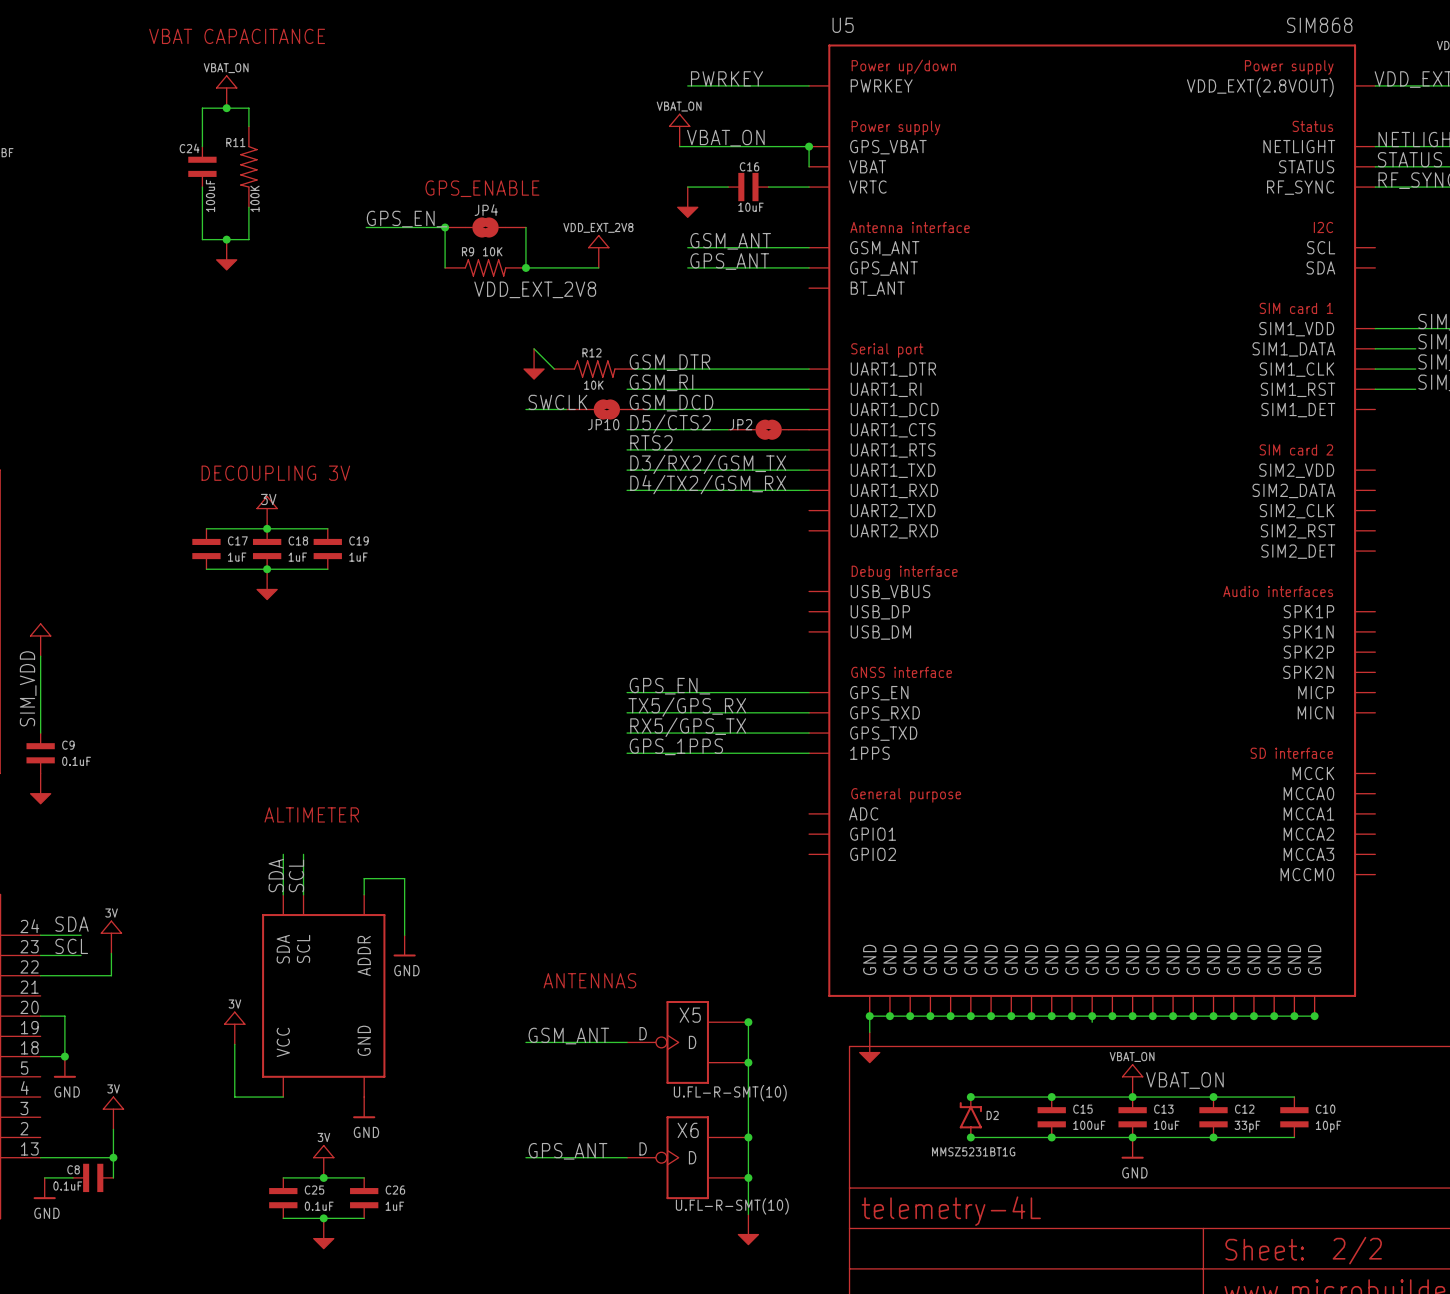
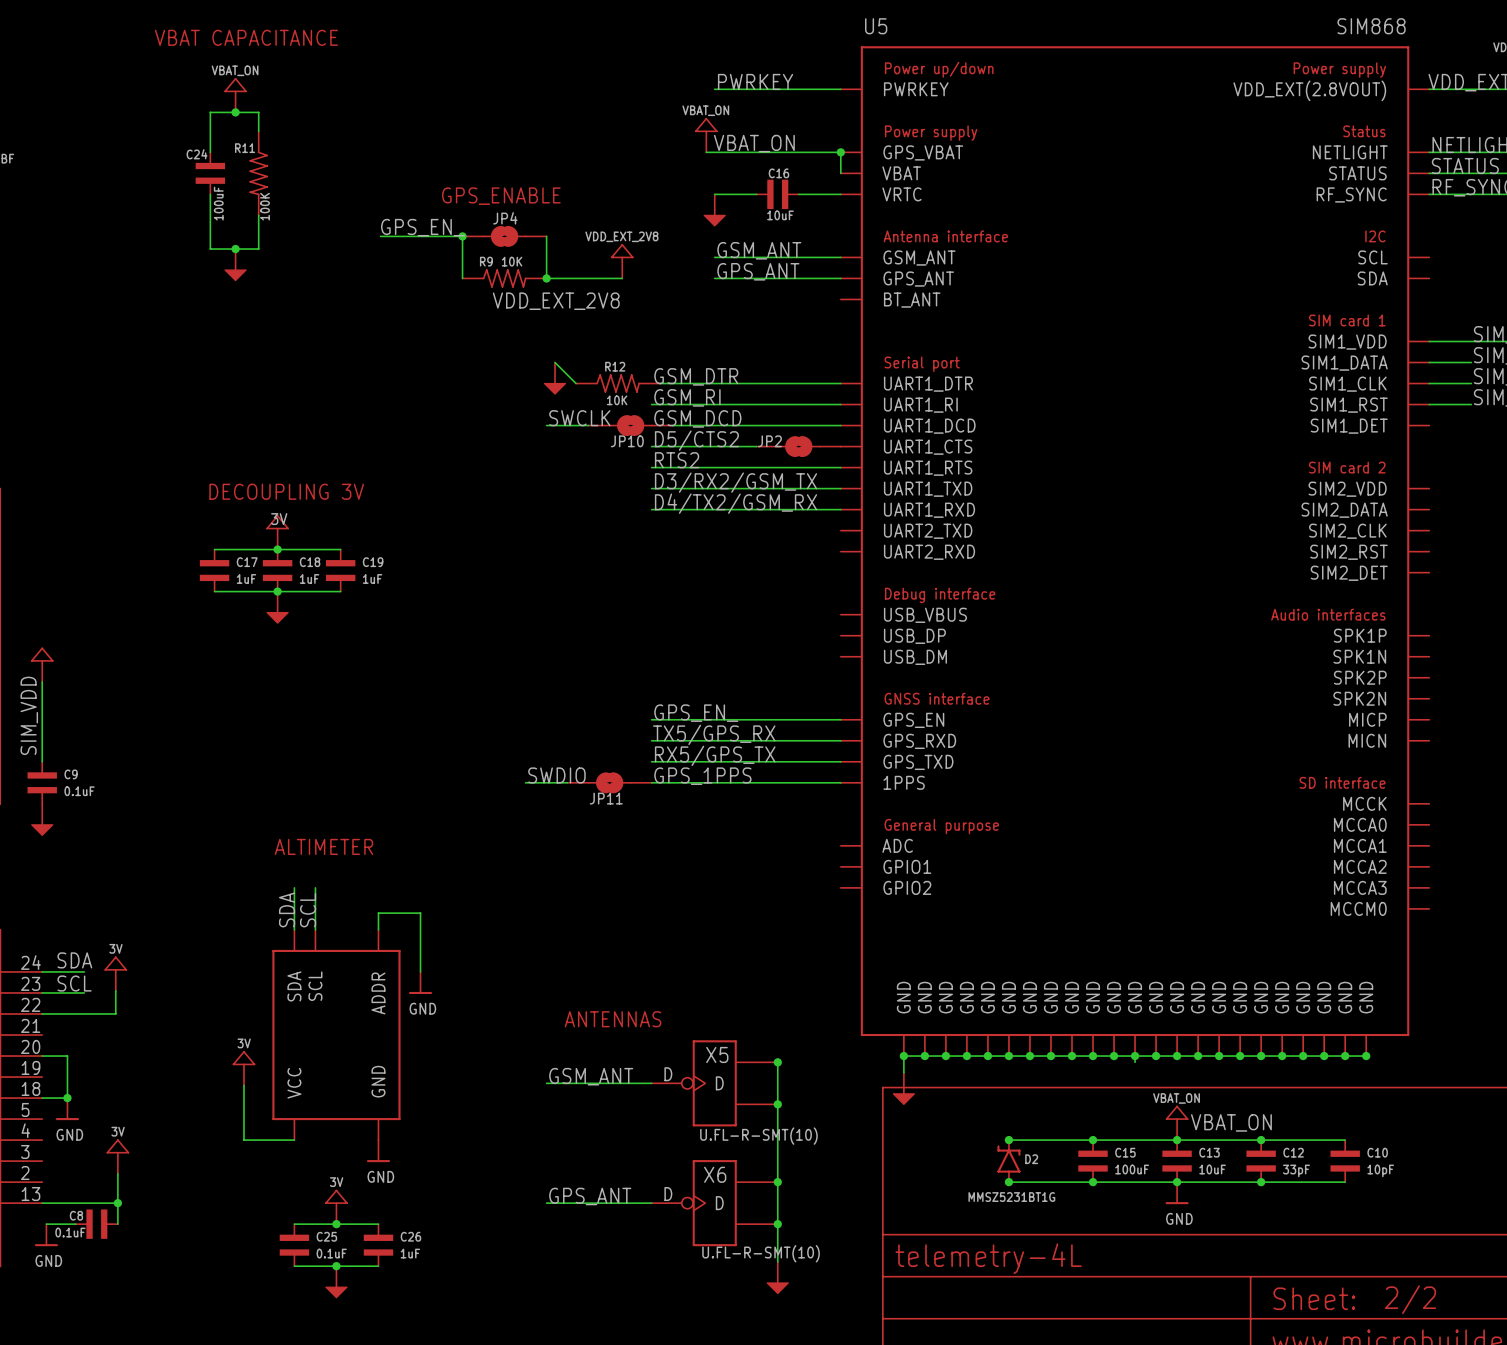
label: none -> SWDIO (556, 775)
wire: none -> (525, 782) (567, 782)
JP11: none -> (609, 782)

